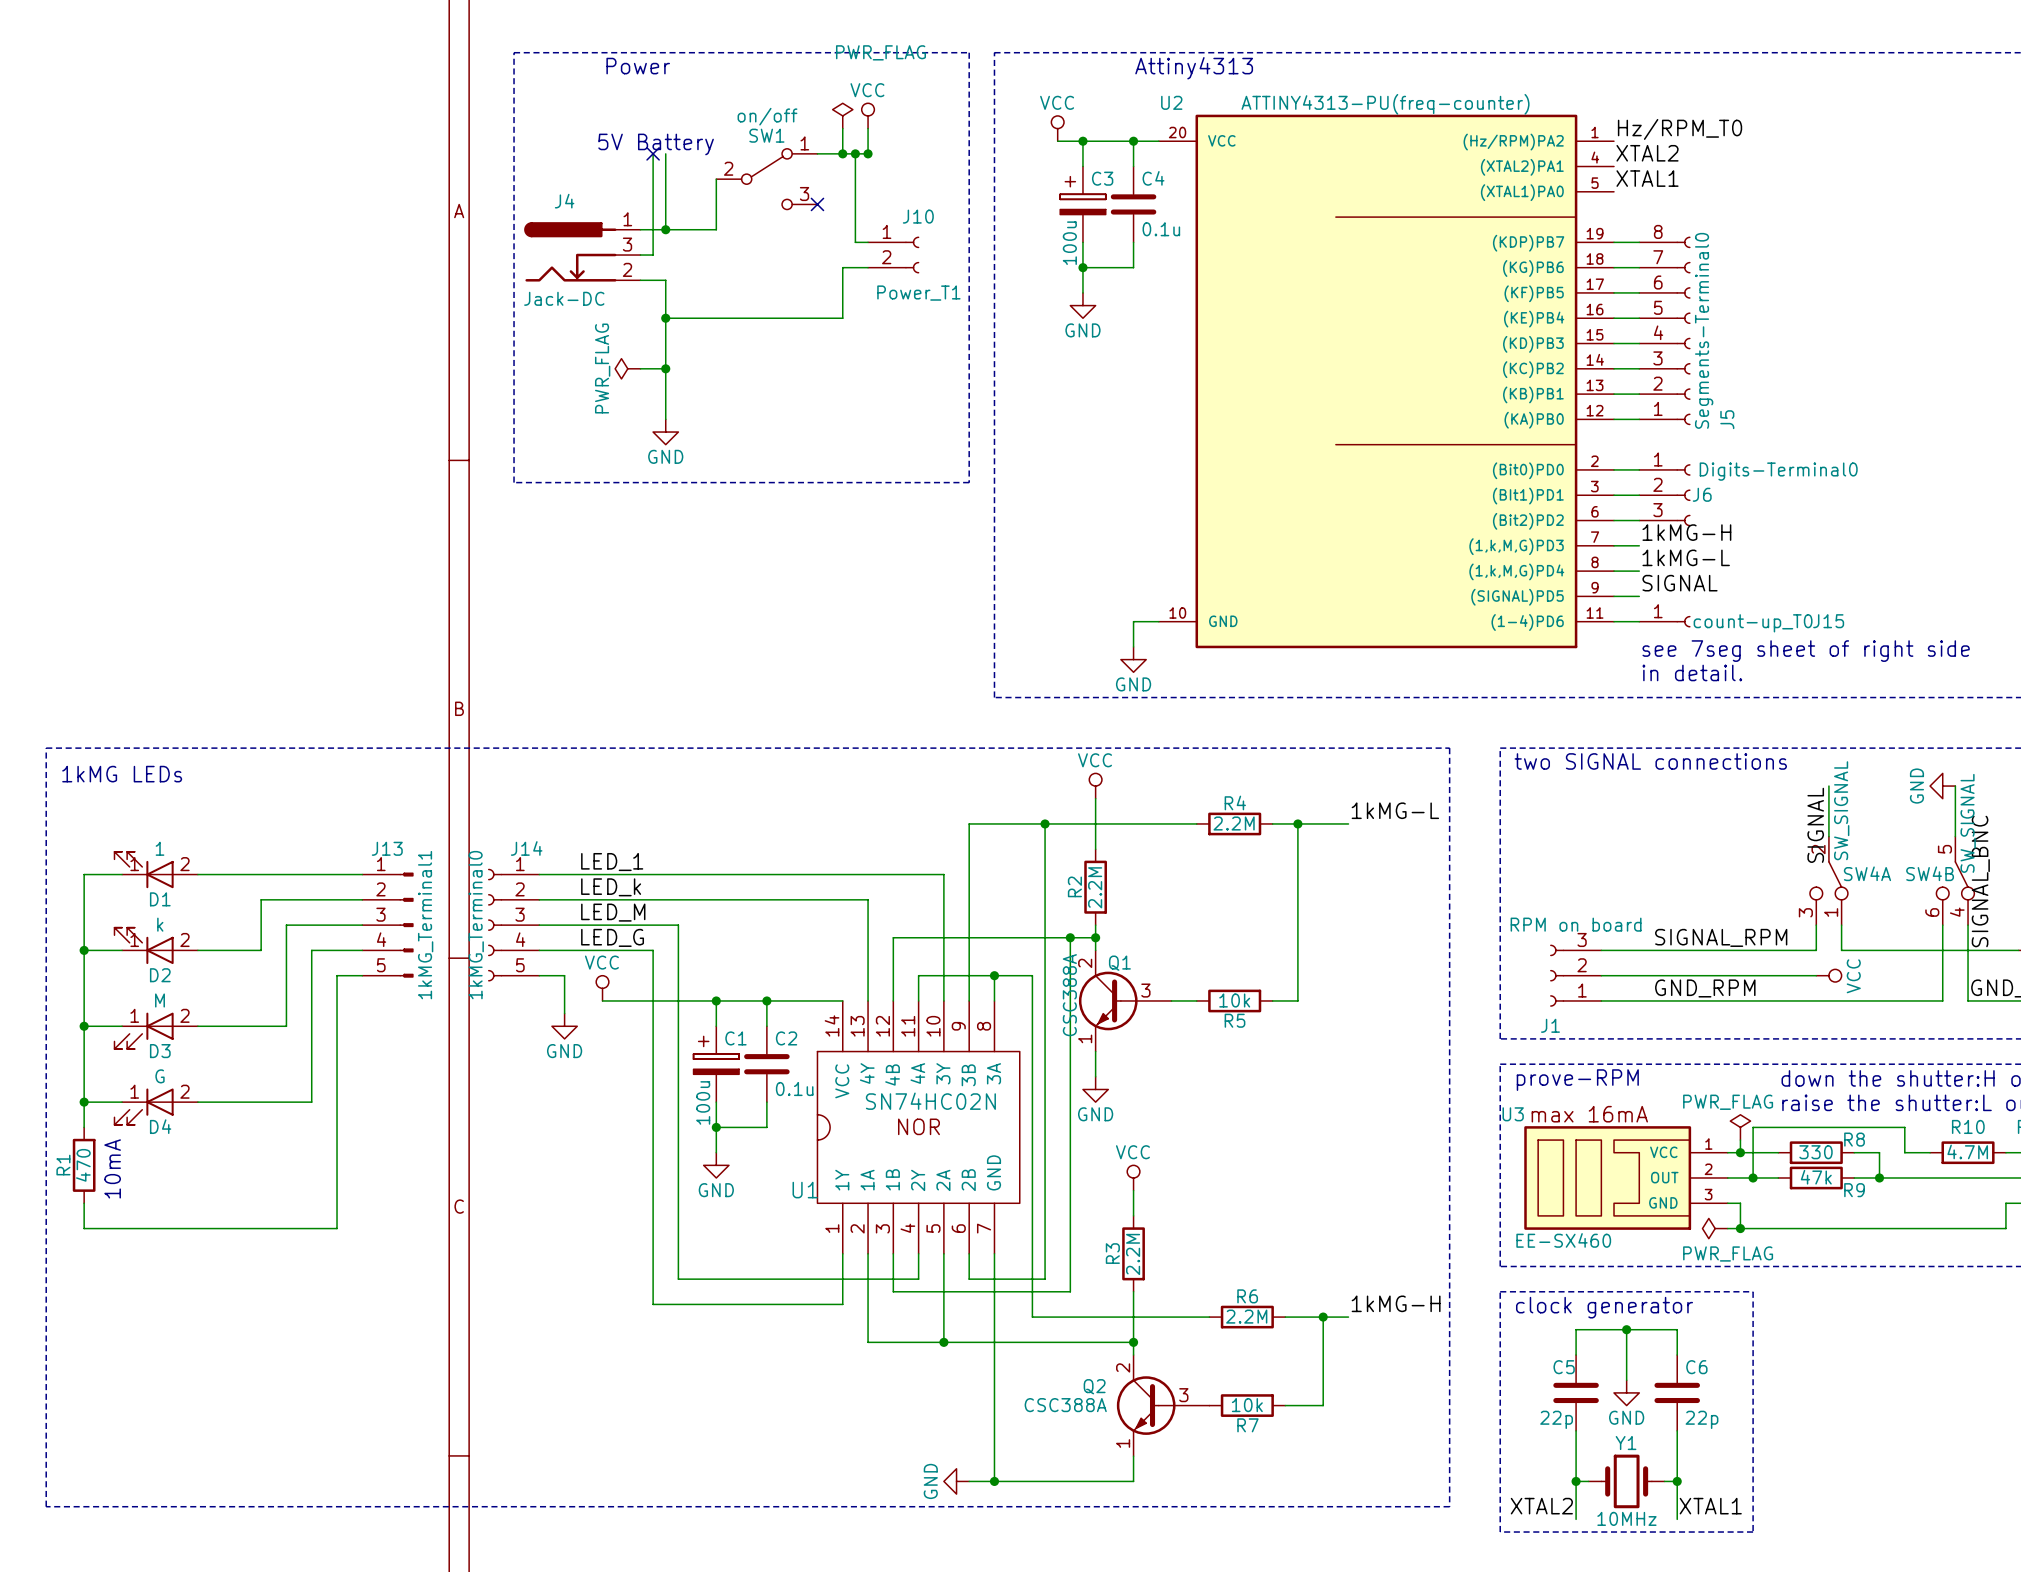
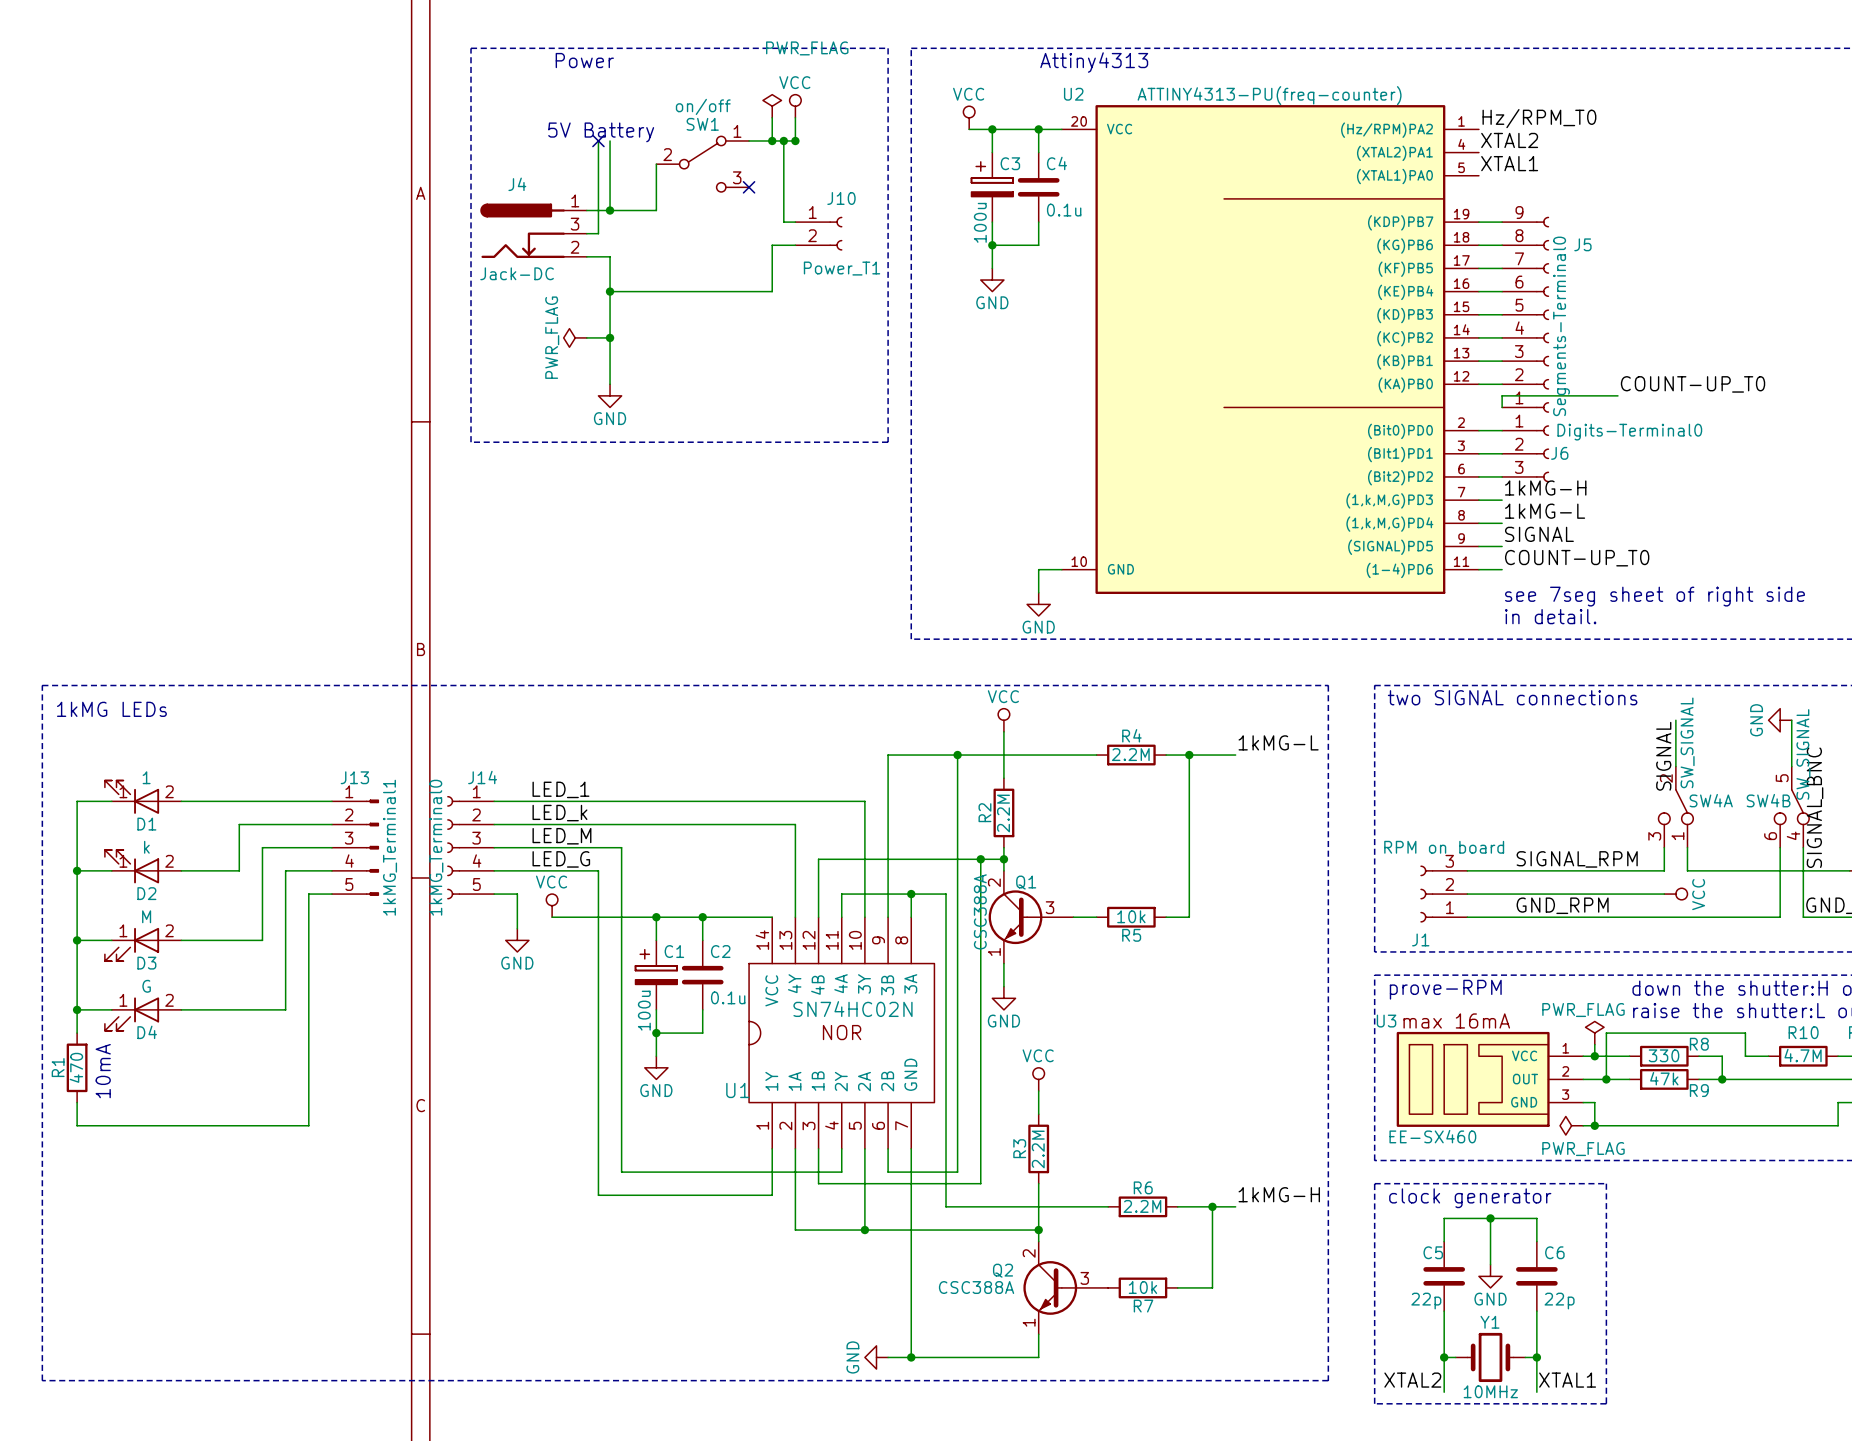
J5 symbol: [1639, 236, 1691, 426] -> [1502, 216, 1550, 413]
J5 name position: J5 (1727, 419) -> J5 (1582, 244)
label: none -> COUNT-UP_T0 (1693, 384)
wire: none -> (1617, 395) (1502, 395) (1502, 407)
label: none -> COUNT-UP_T0 (1577, 558)
J15: count-up_T0 (1664, 621) -> none

